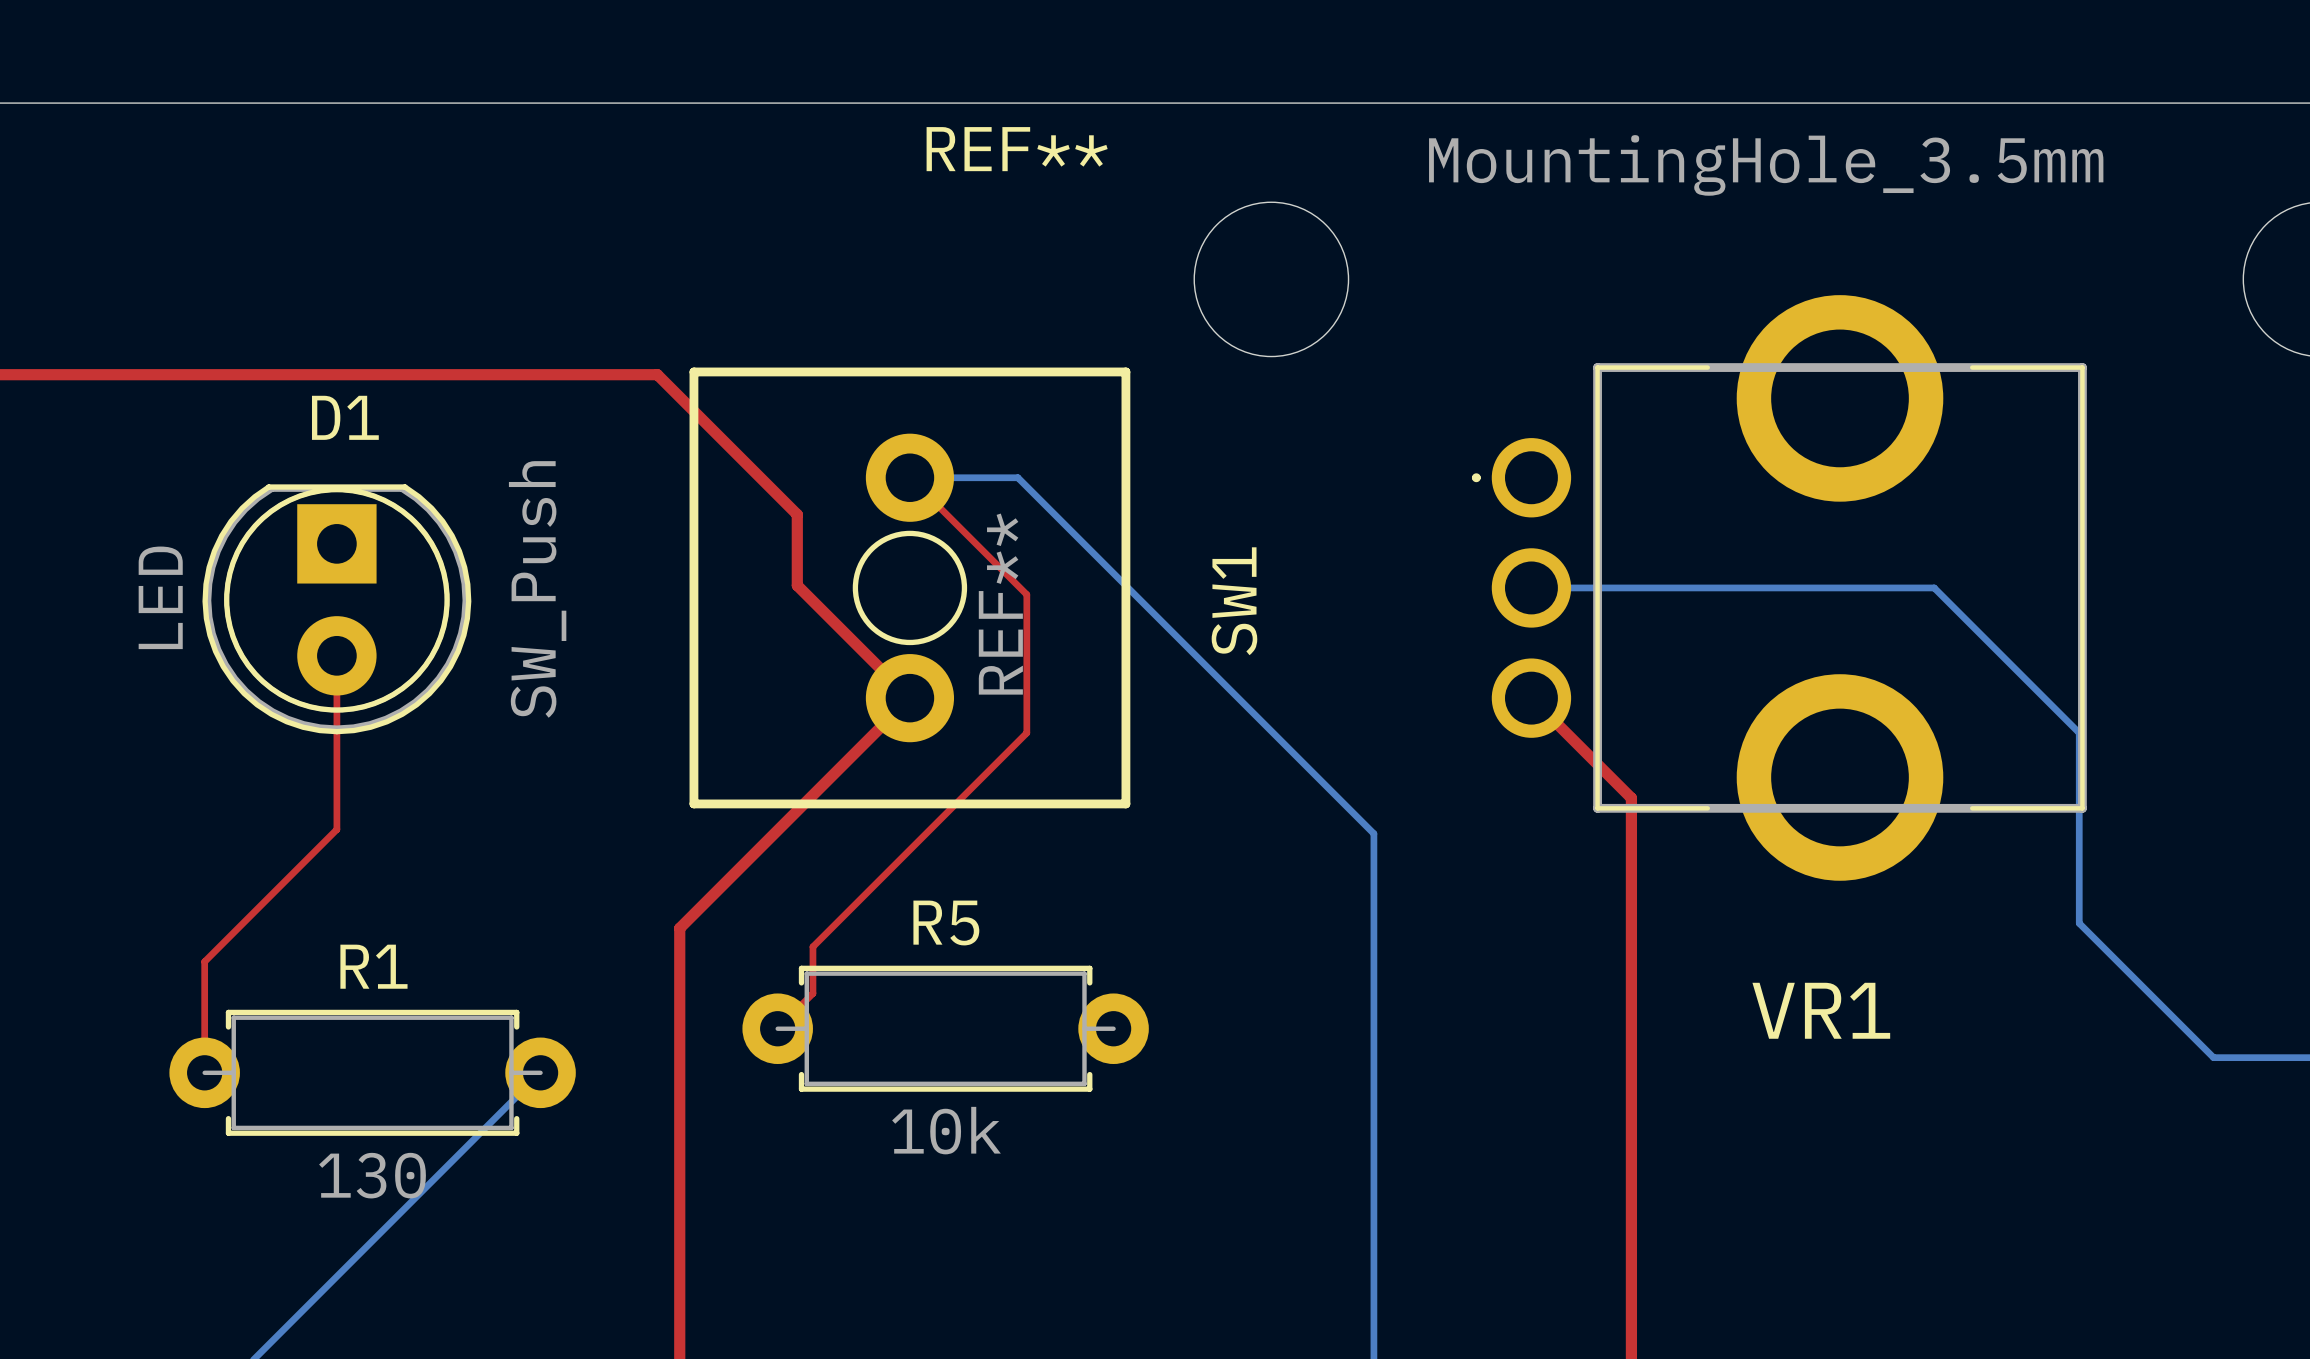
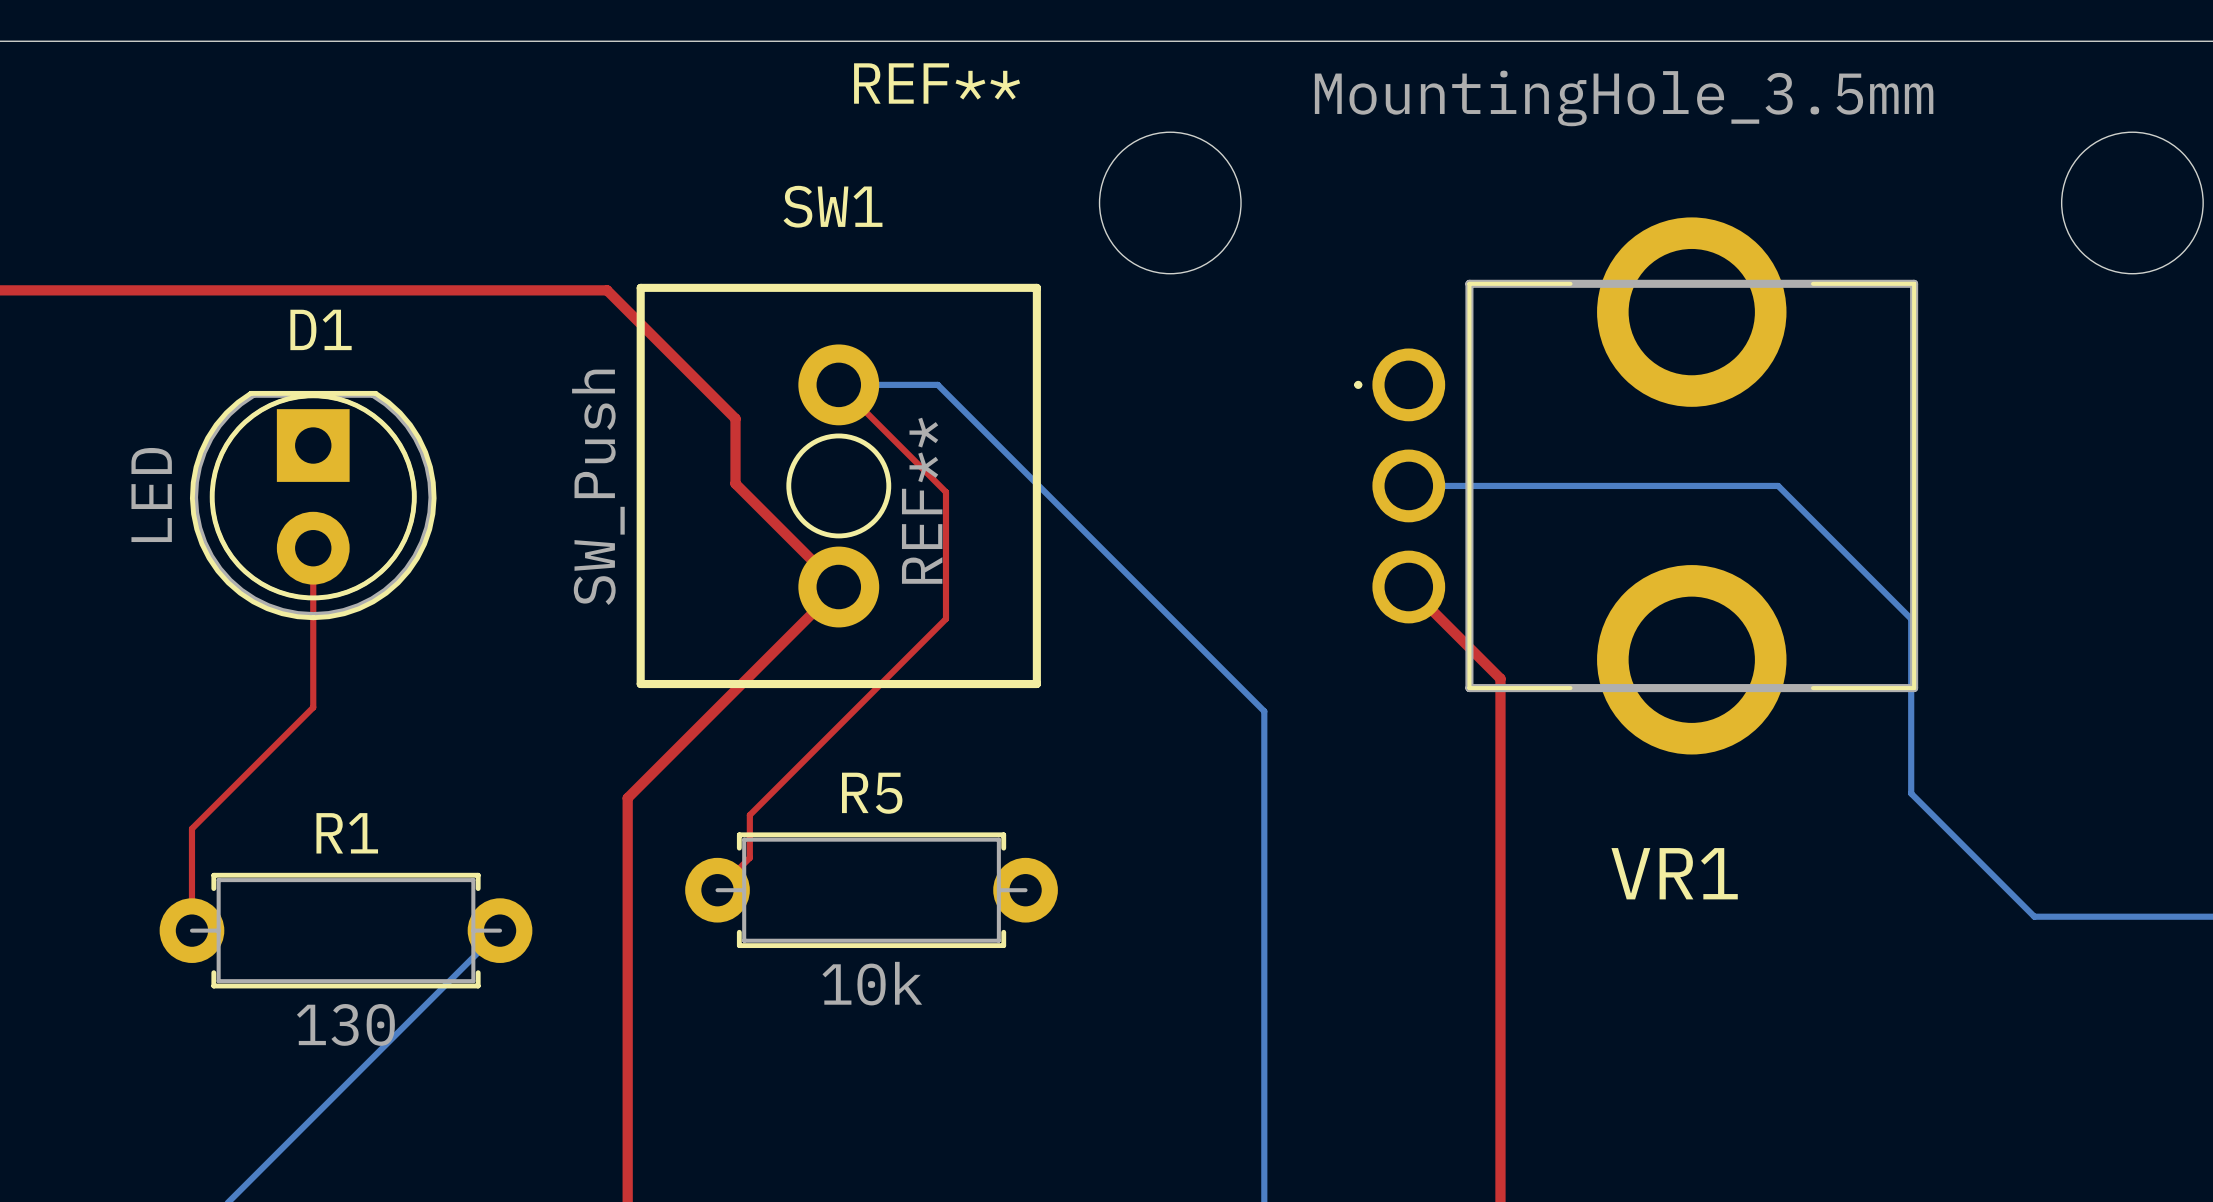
SW1 value position: SW_Push (537, 589) -> SW_Push (598, 487)
SW1 name rotation: 0° (1234, 601) -> 90° clockwise (832, 206)
SW1 name position: SW1 (1234, 601) -> SW1 (832, 206)

